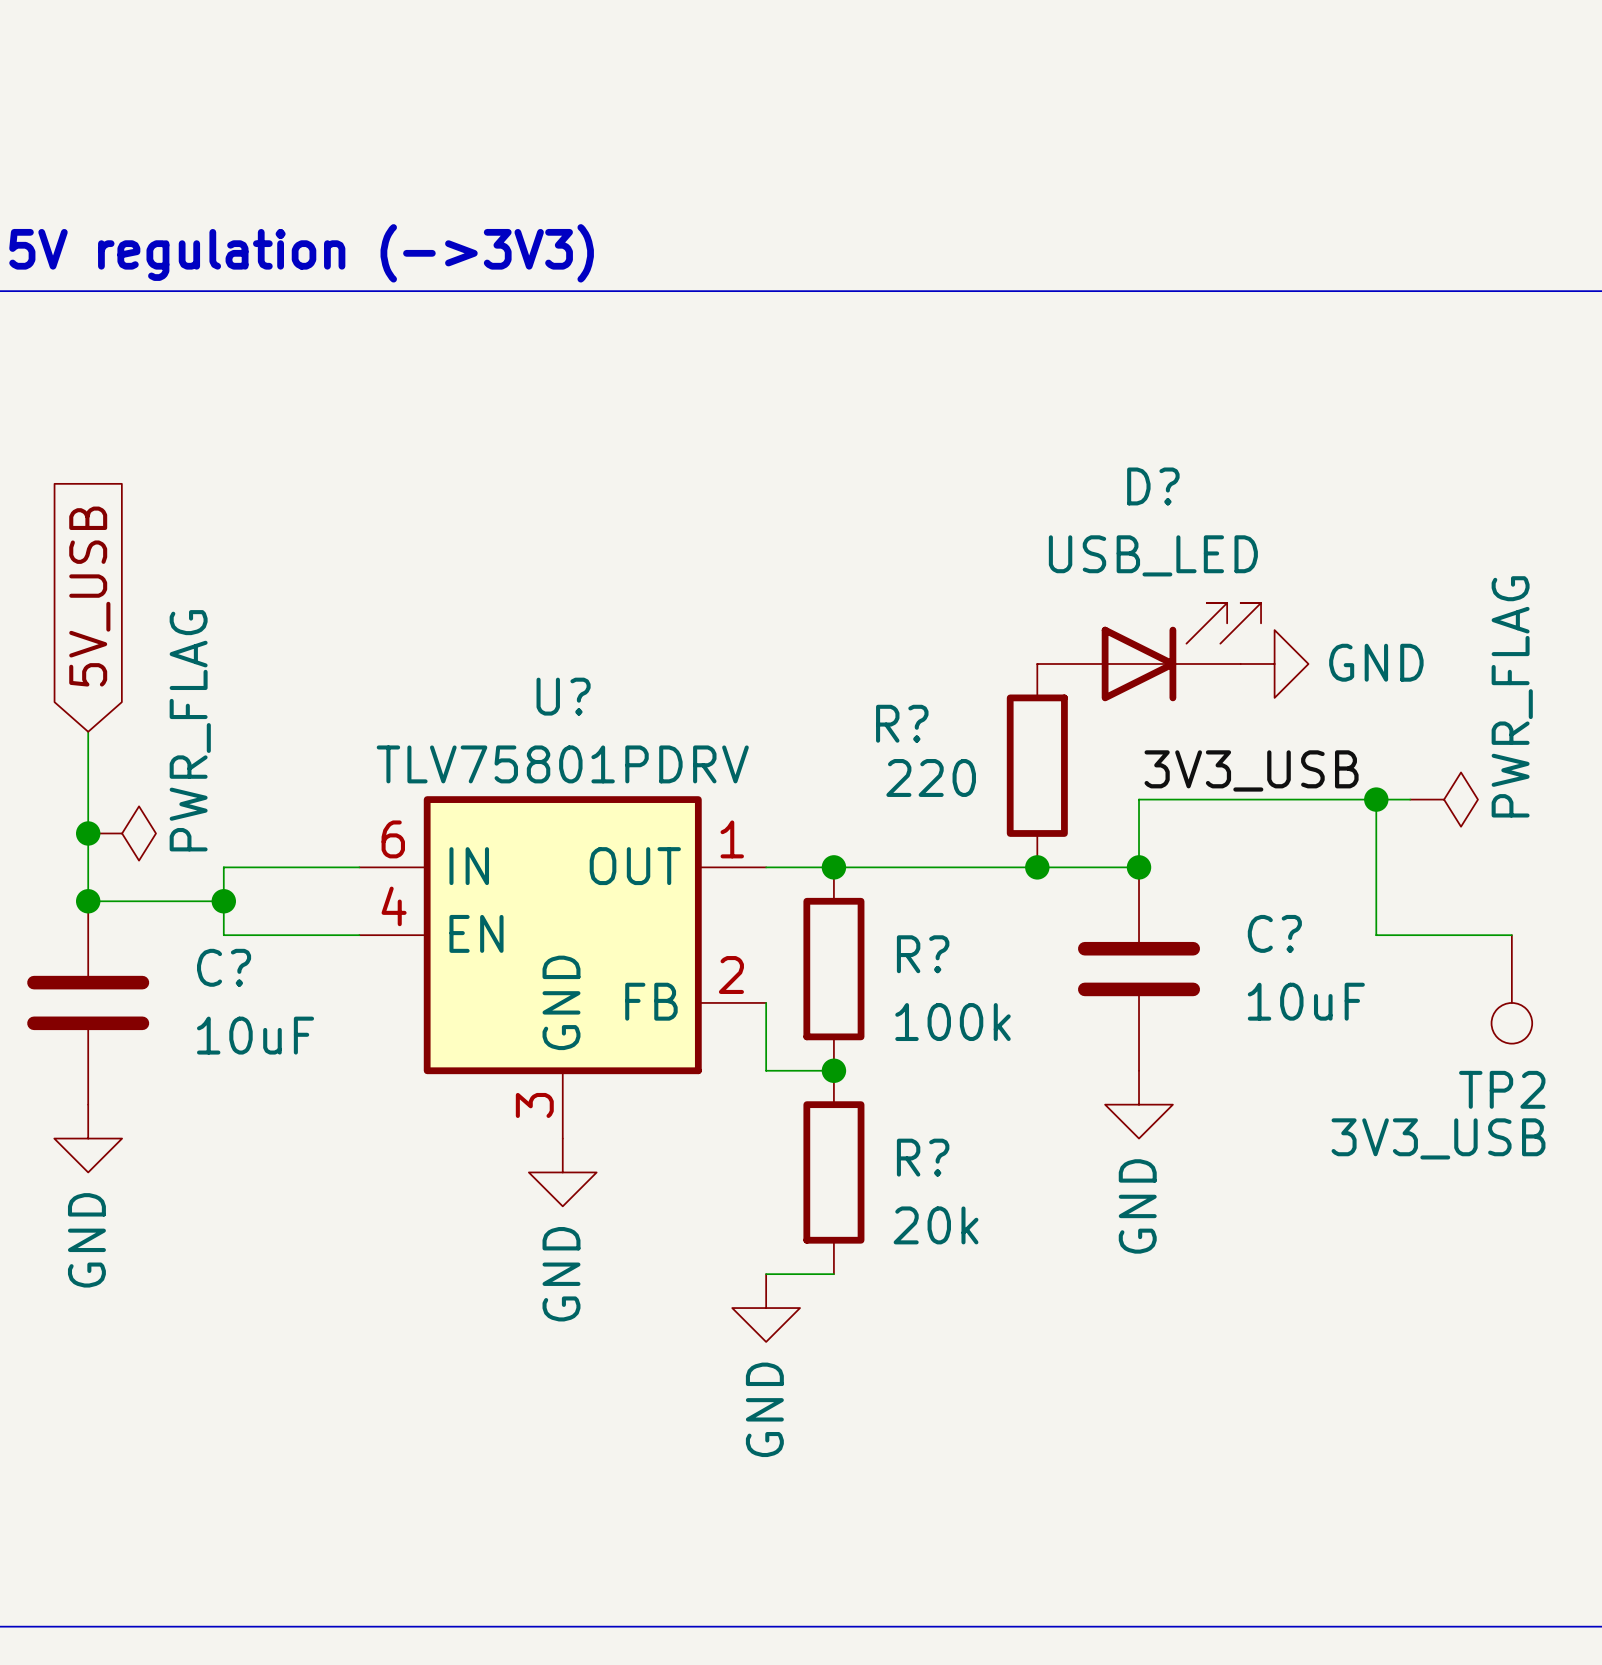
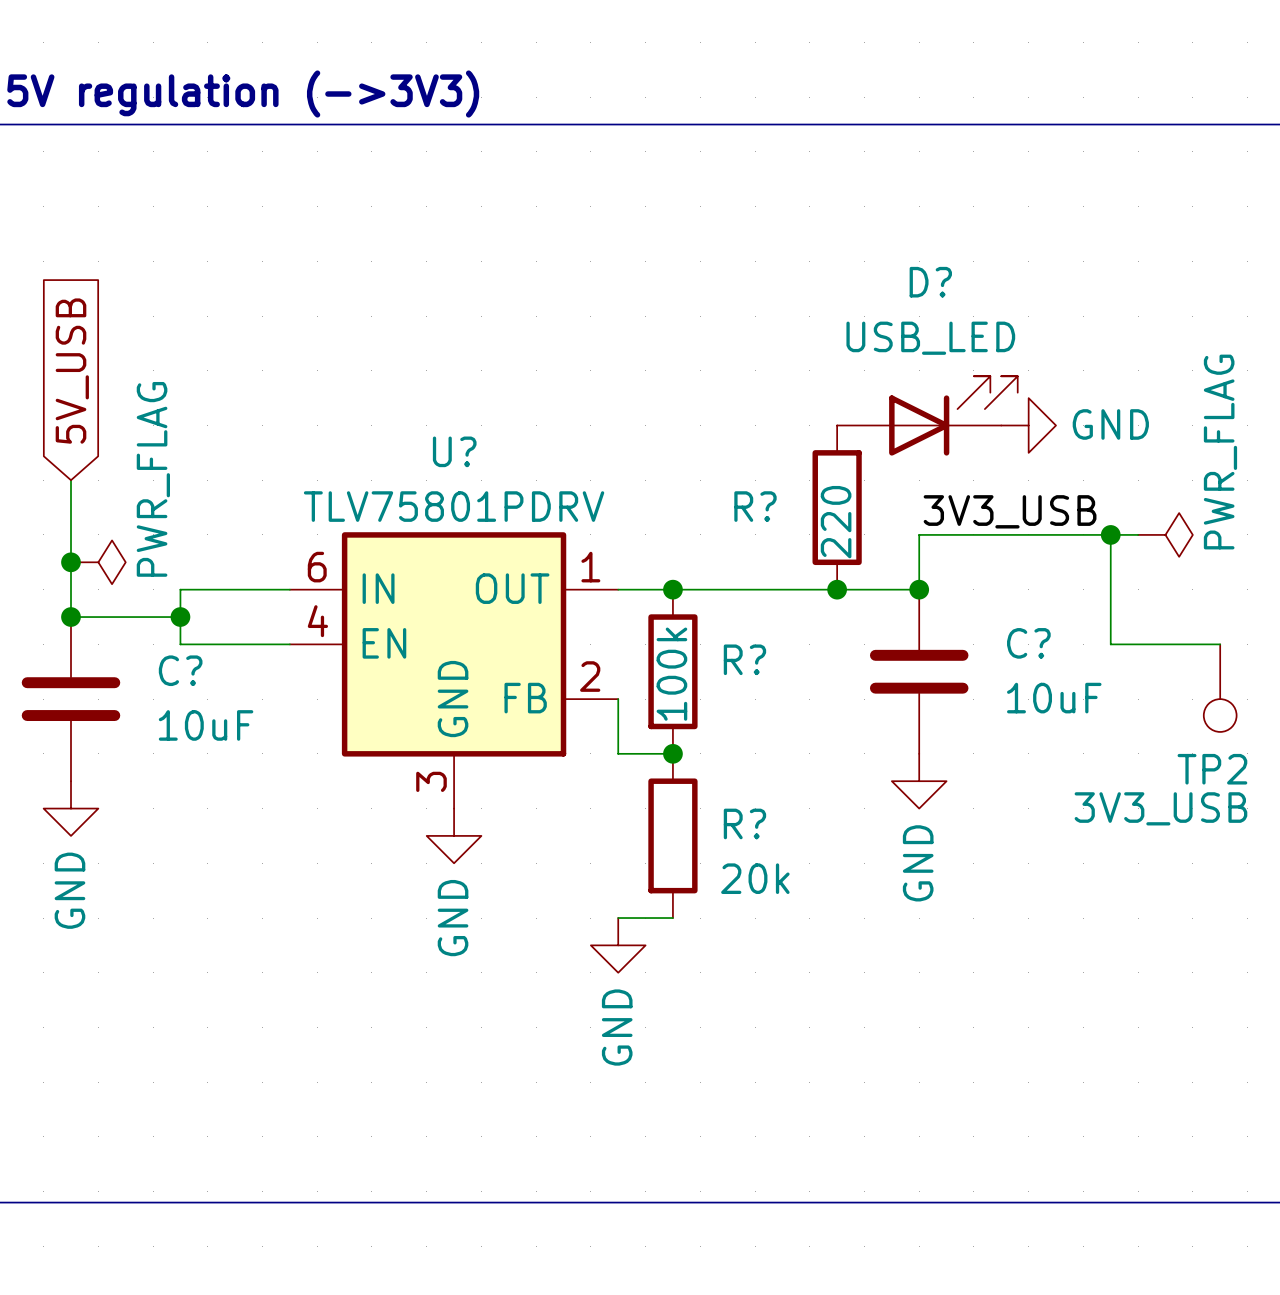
R? name position: R? (902, 723) -> R? (755, 506)
R? value rotation: 0° (931, 777) -> 90° counterclockwise (836, 522)
R? value rotation: 0° (952, 1022) -> 90° counterclockwise (671, 674)

